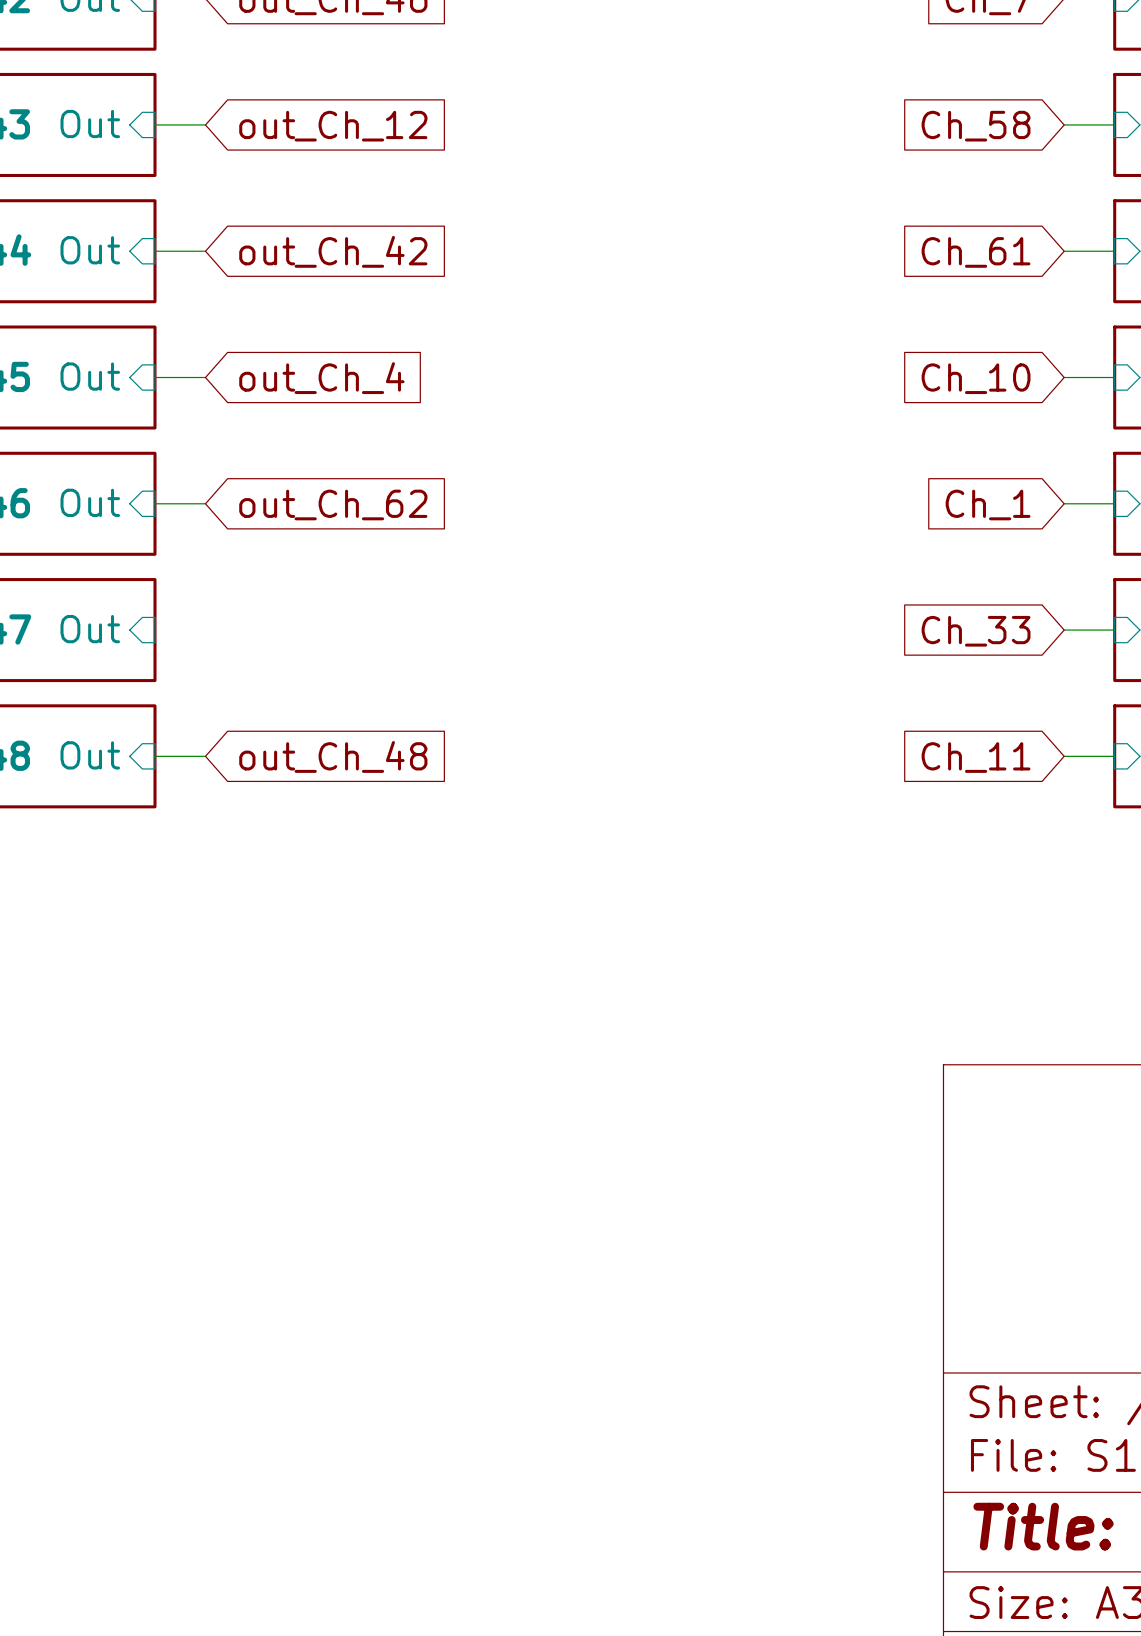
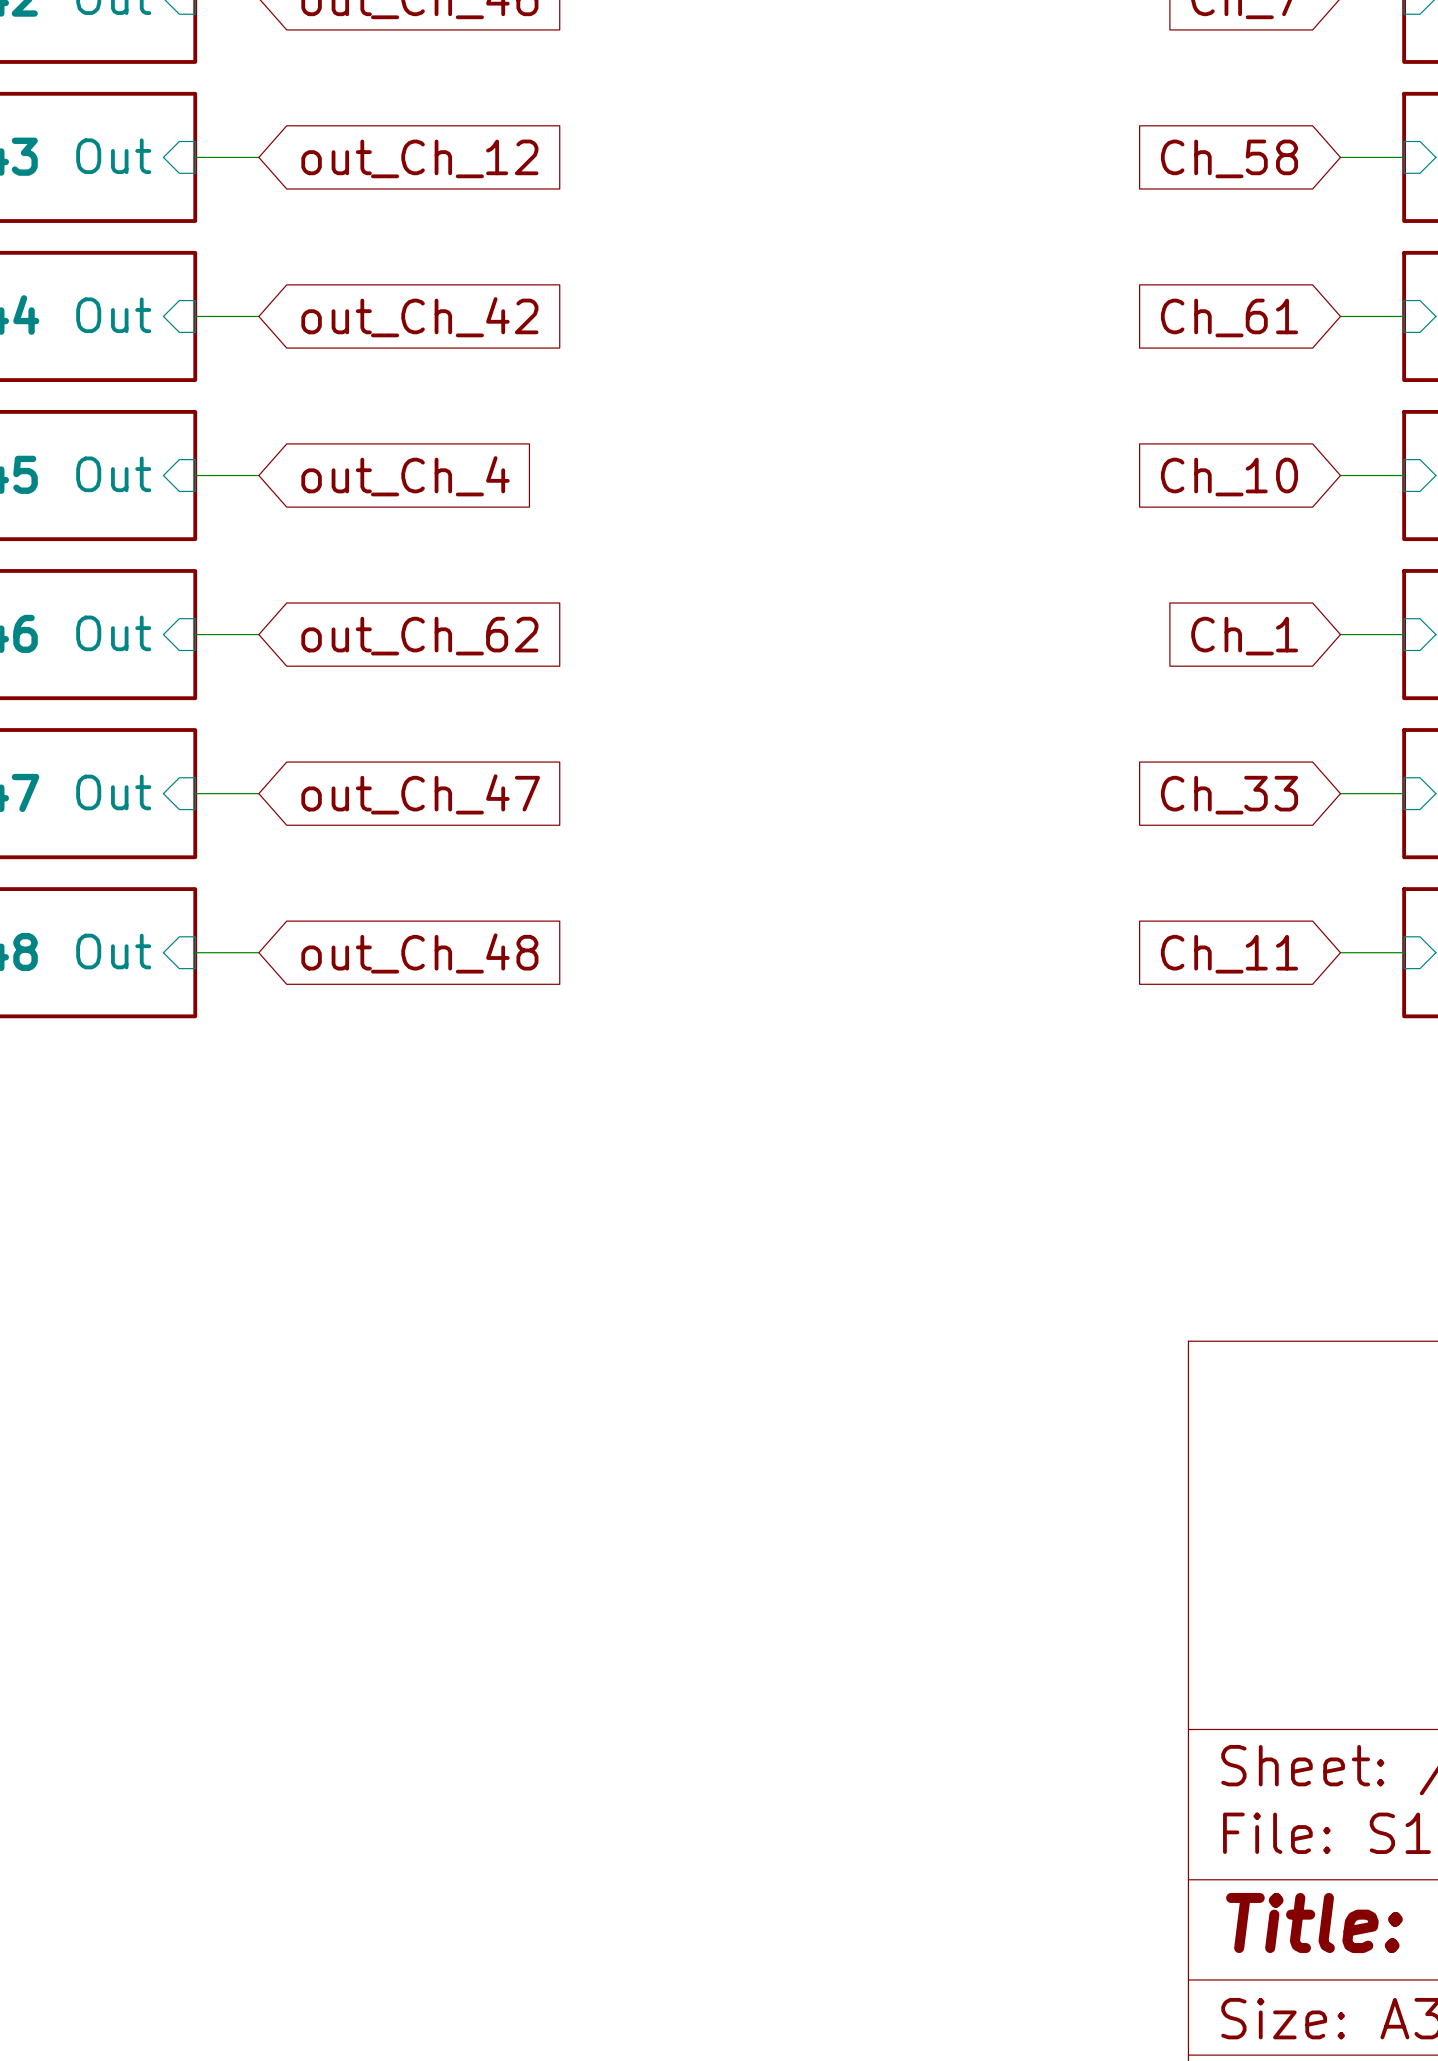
wire: none -> (195, 793) (258, 793)
global label: none -> out_Ch_47 (420, 794)

